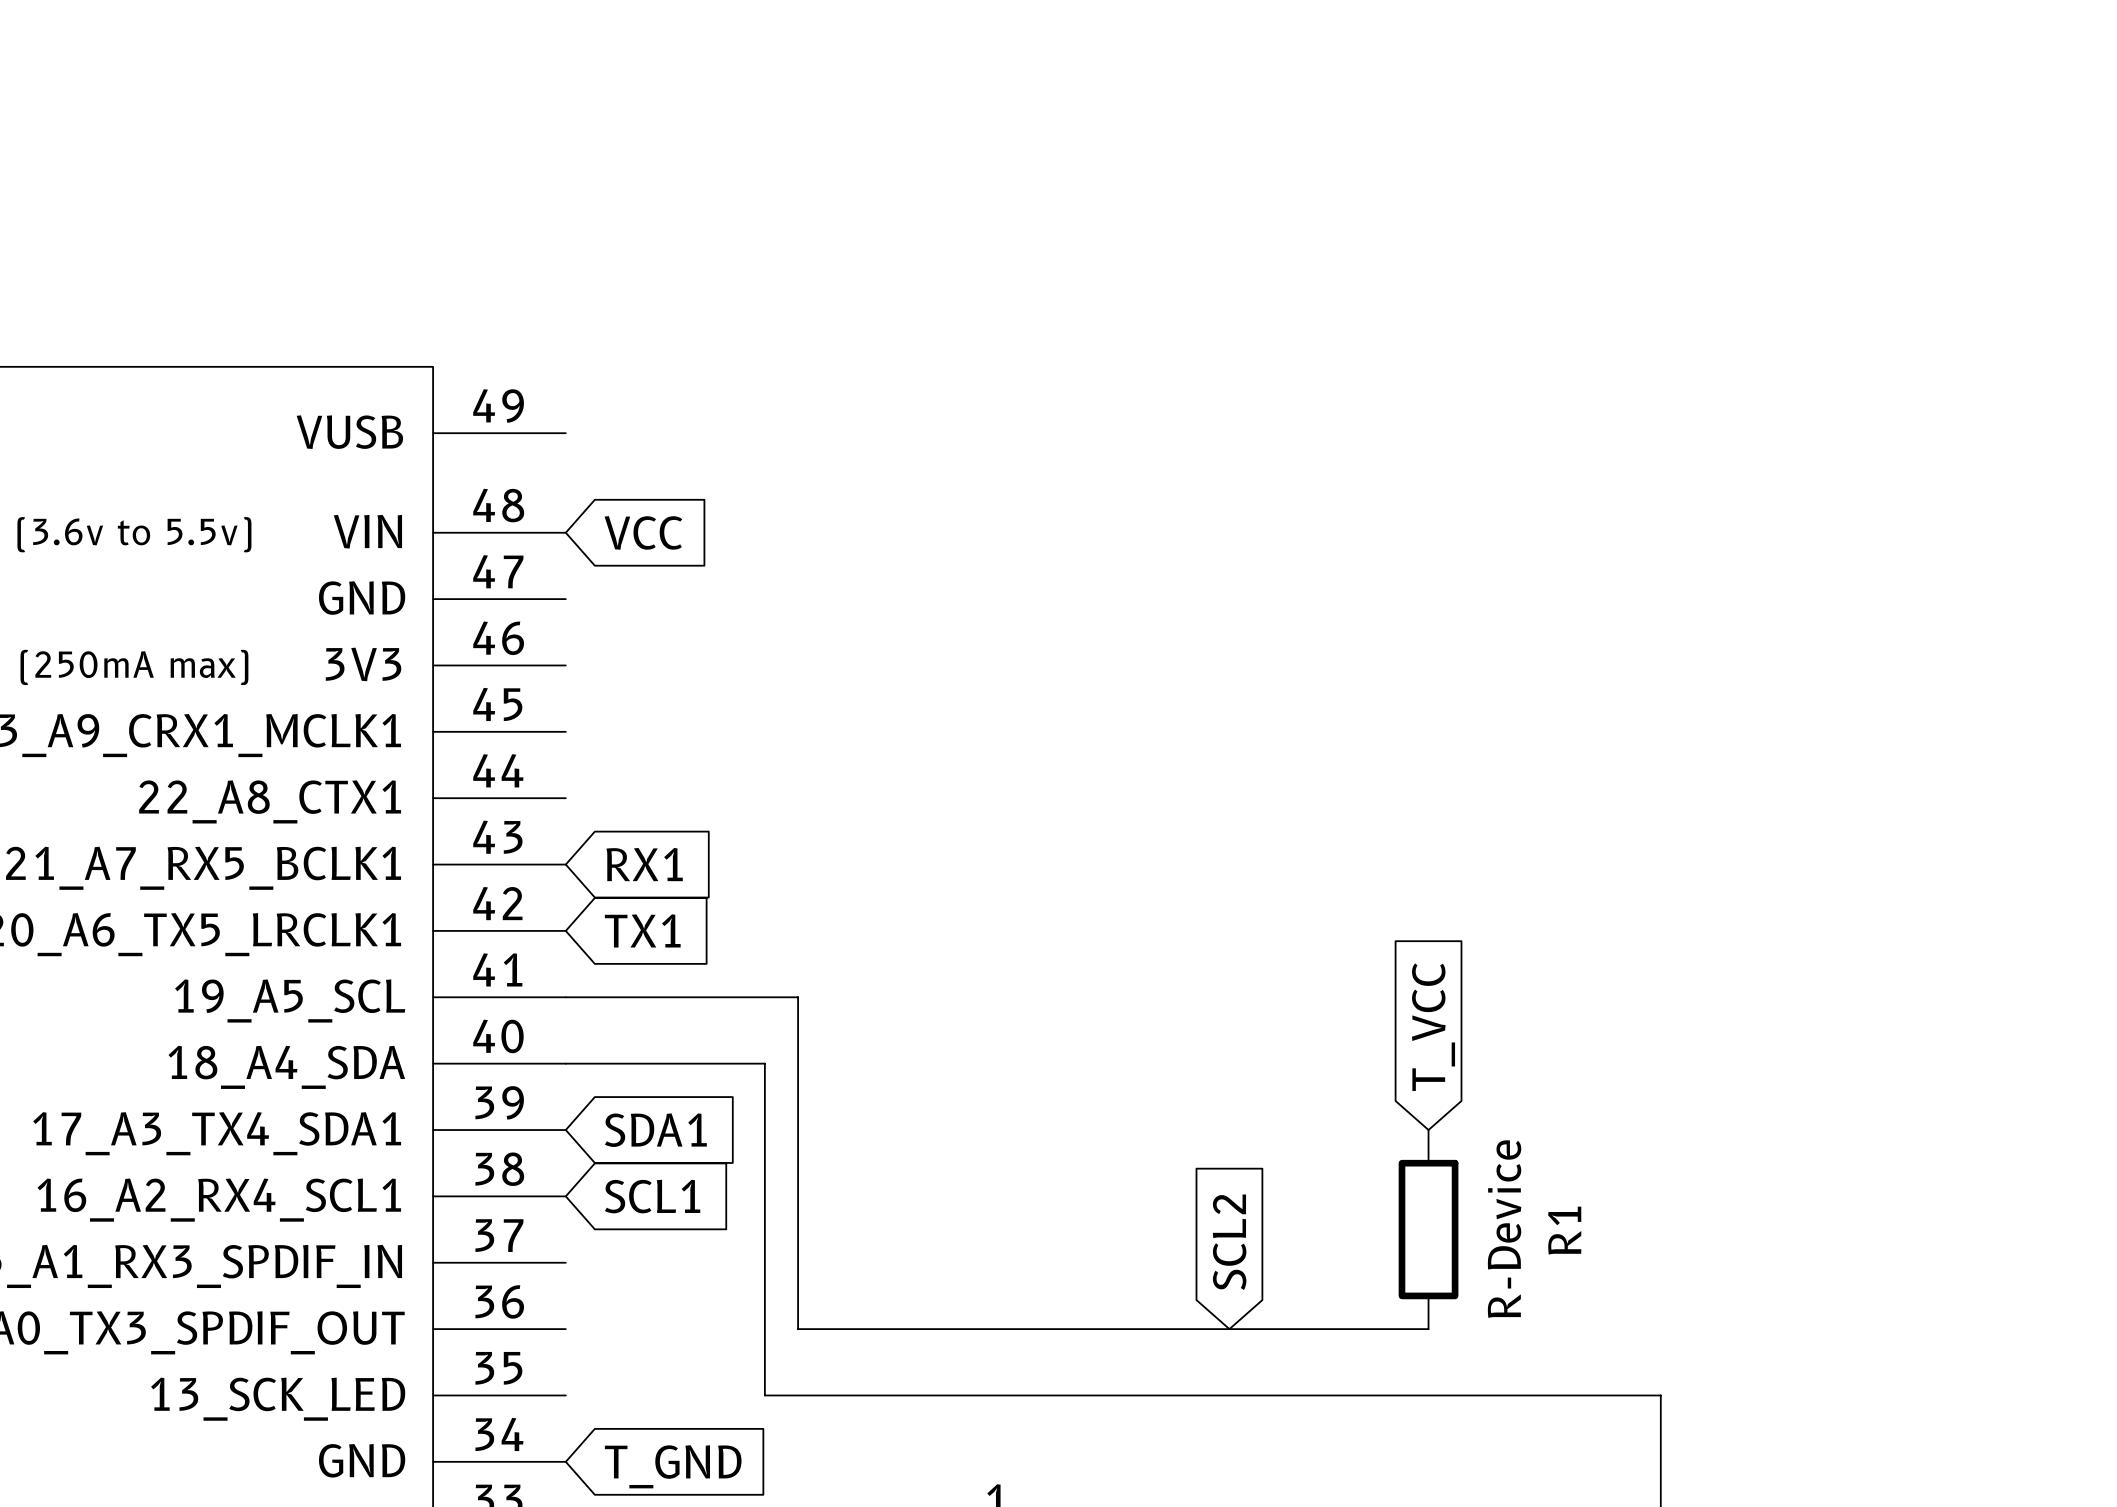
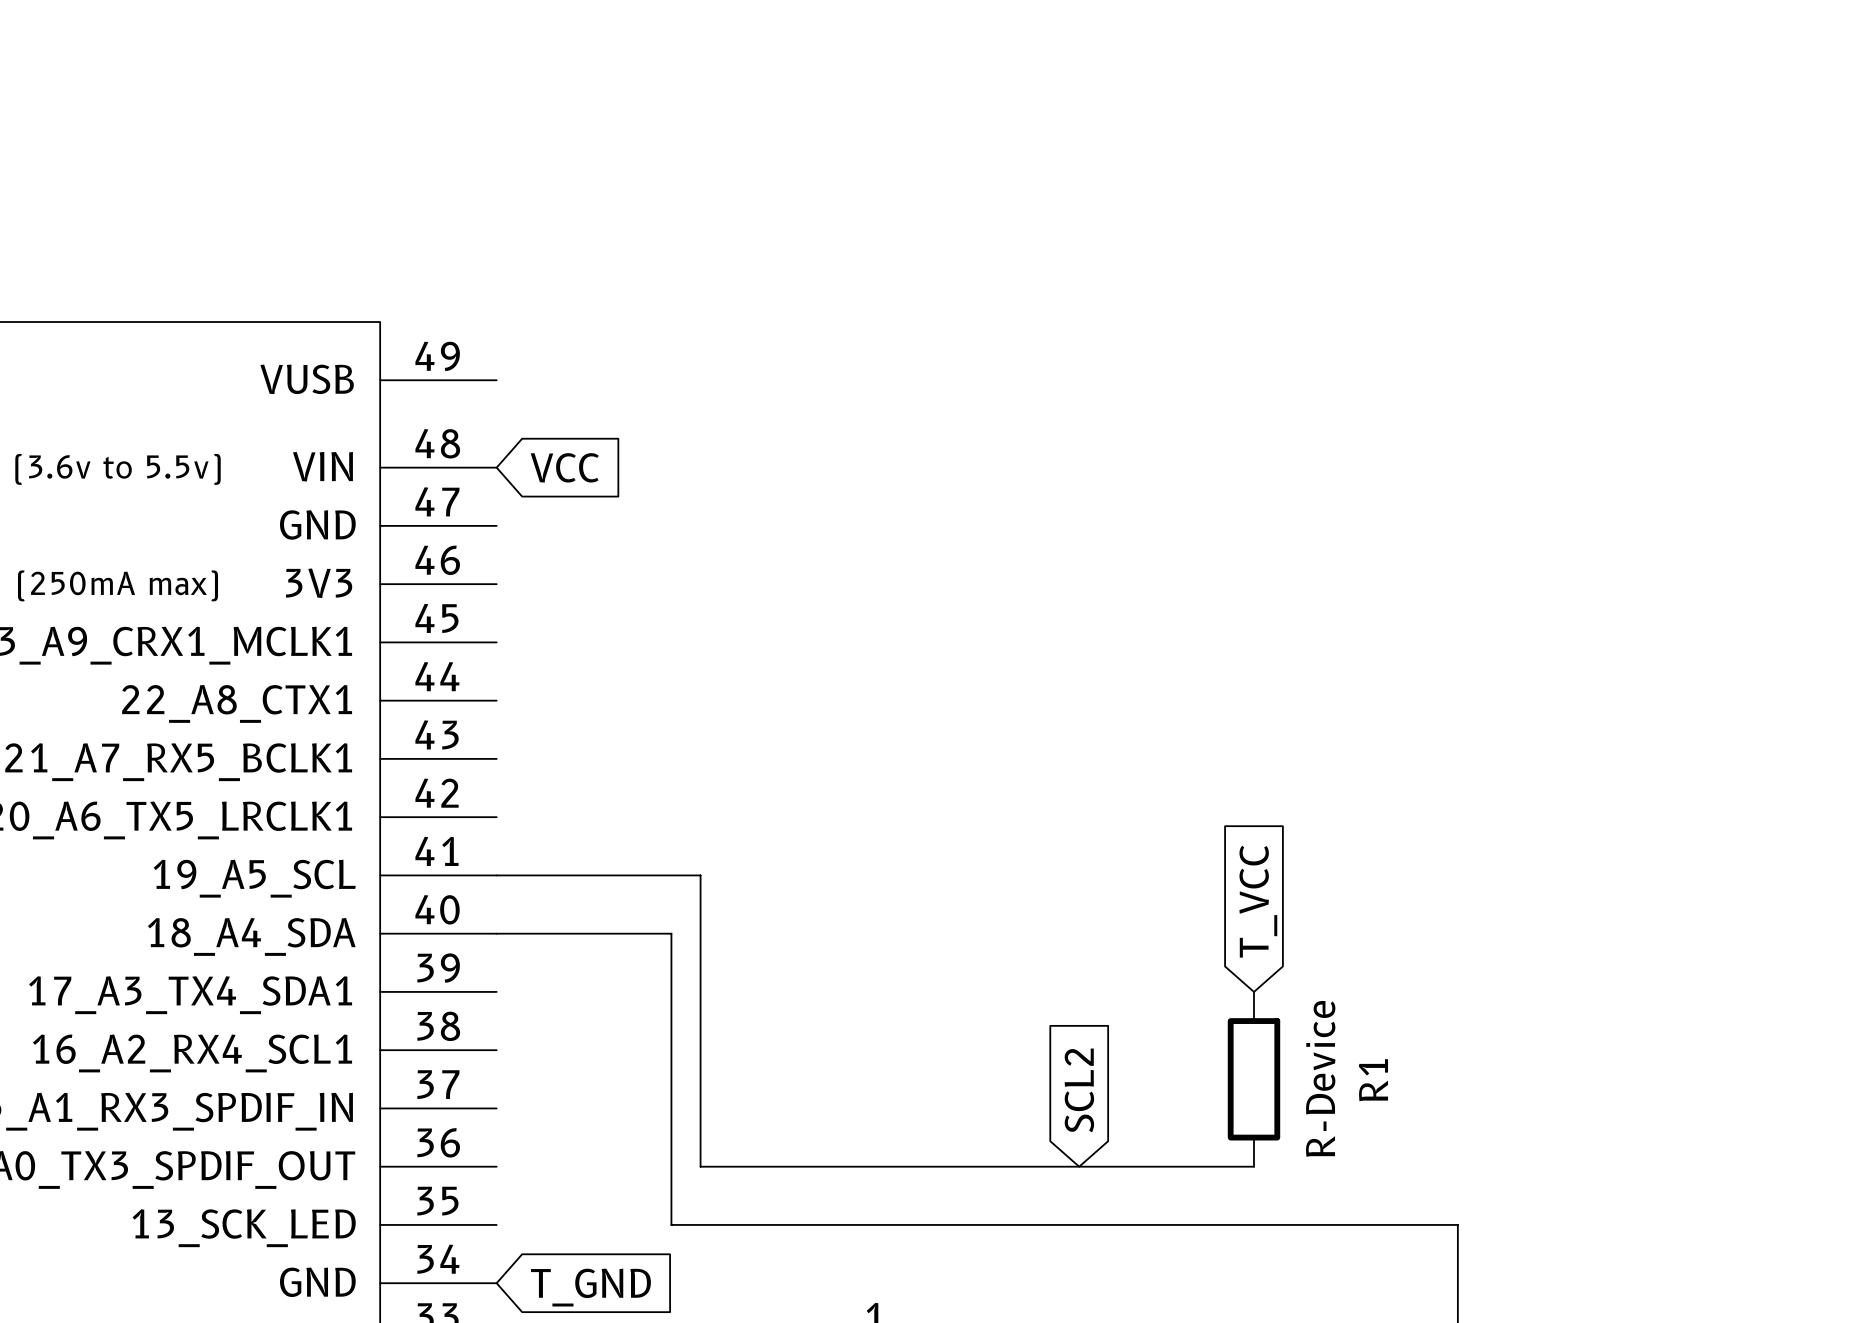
global label: RX1 (644, 864) -> none
global label: TX1 (642, 930) -> none
global label: SDA1 (655, 1130) -> none
global label: SCL1 (652, 1196) -> none

